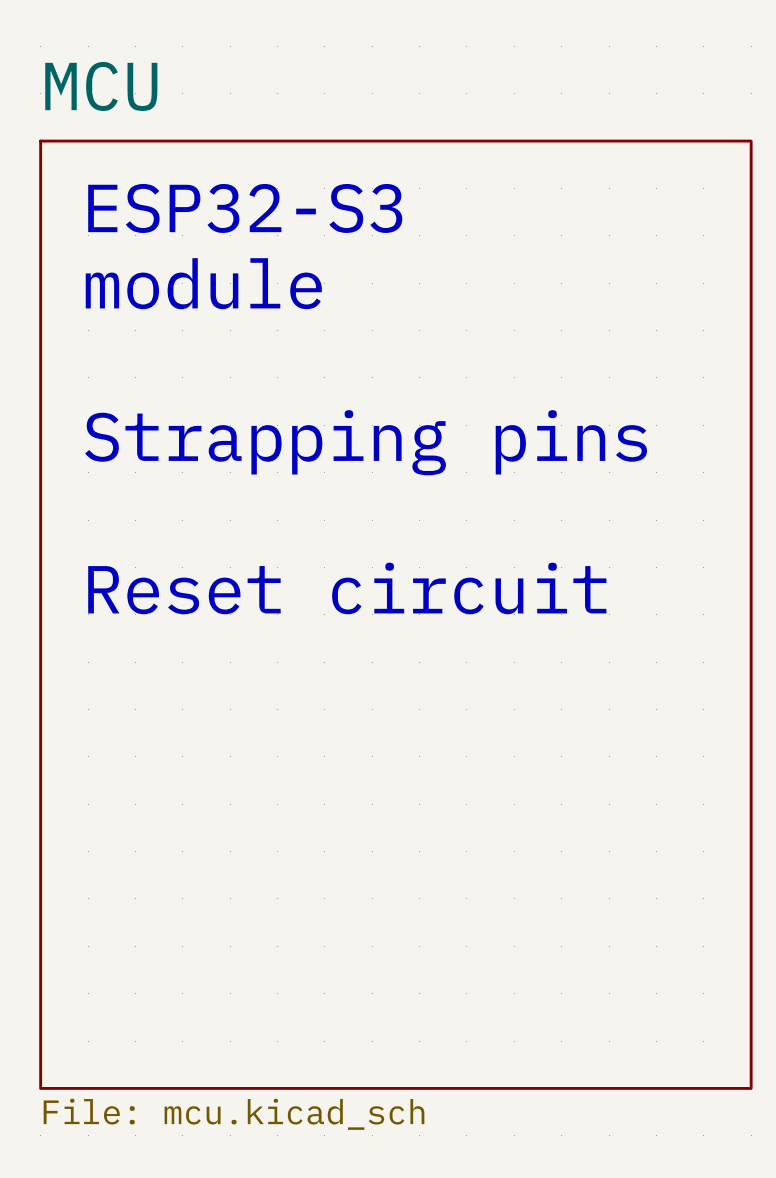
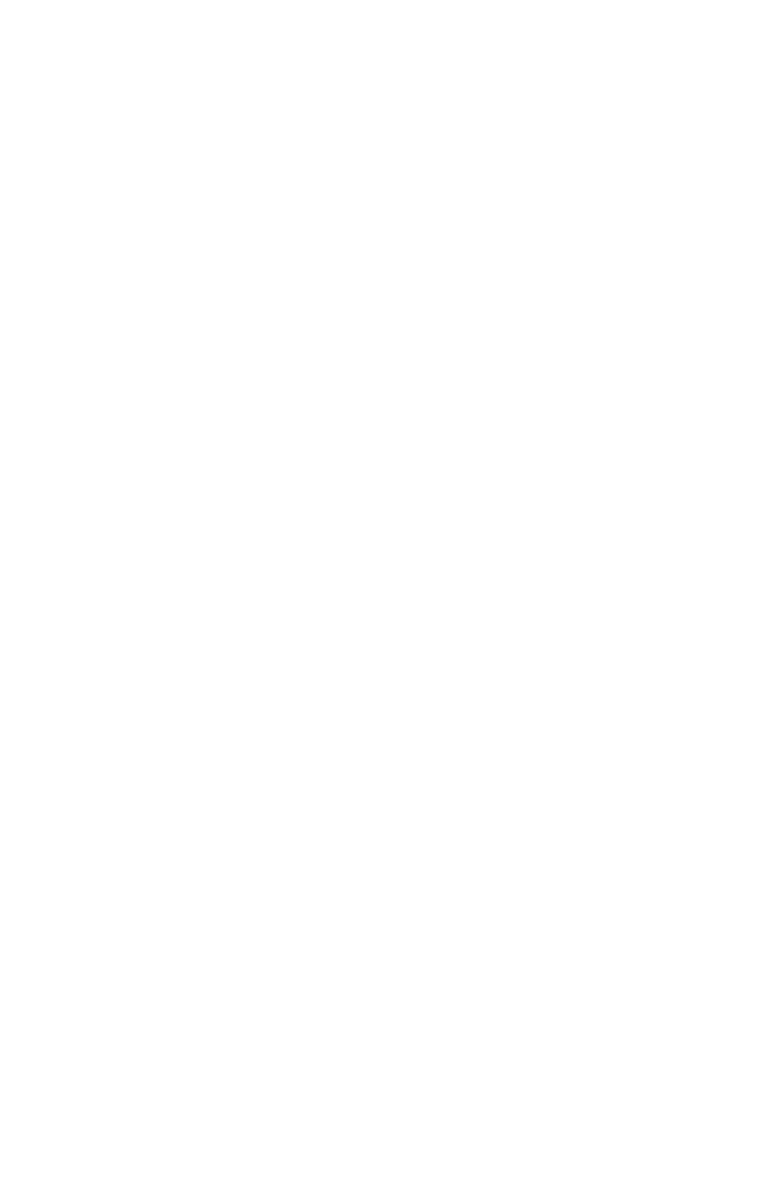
text: ESP32-S3 (245, 208) -> none
text: module (203, 283) -> none
text: Strapping pins (366, 442) -> none
text: Reset circuit (347, 588) -> none
sheet MCU: File: mcu.kicad_sch (395, 614) -> none

